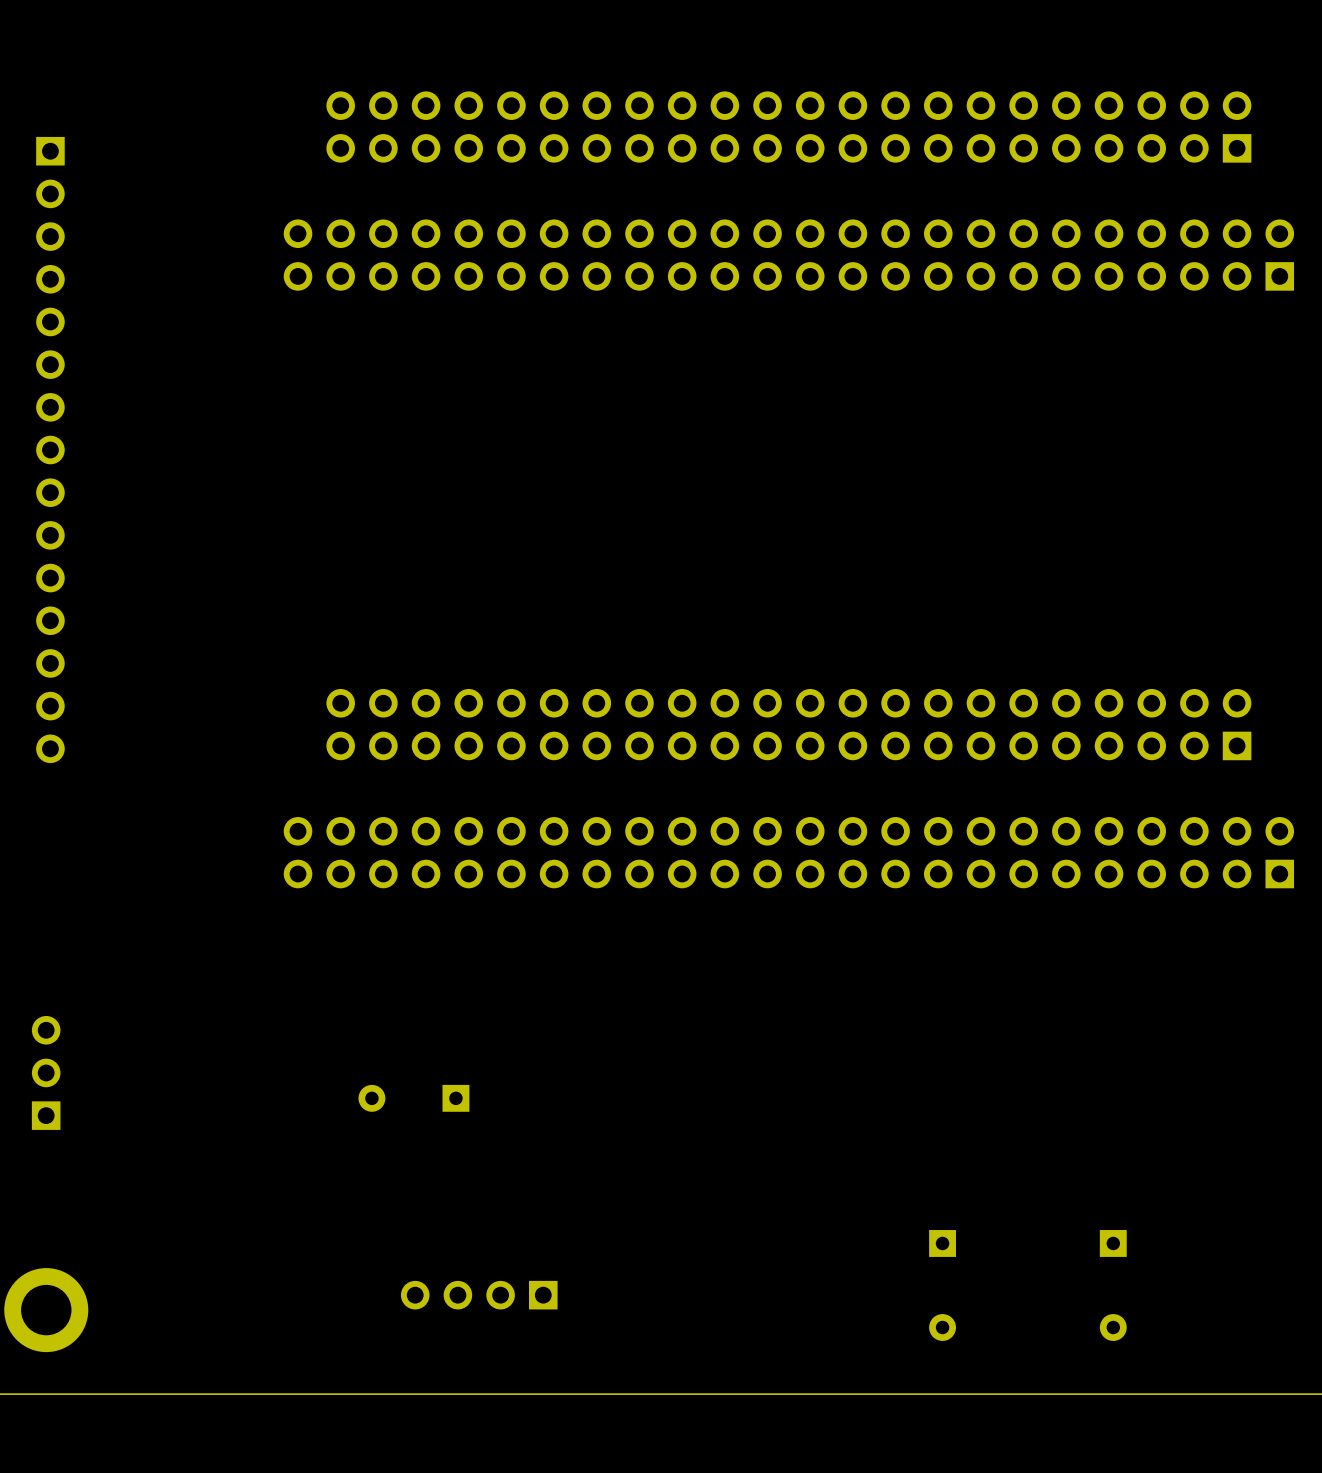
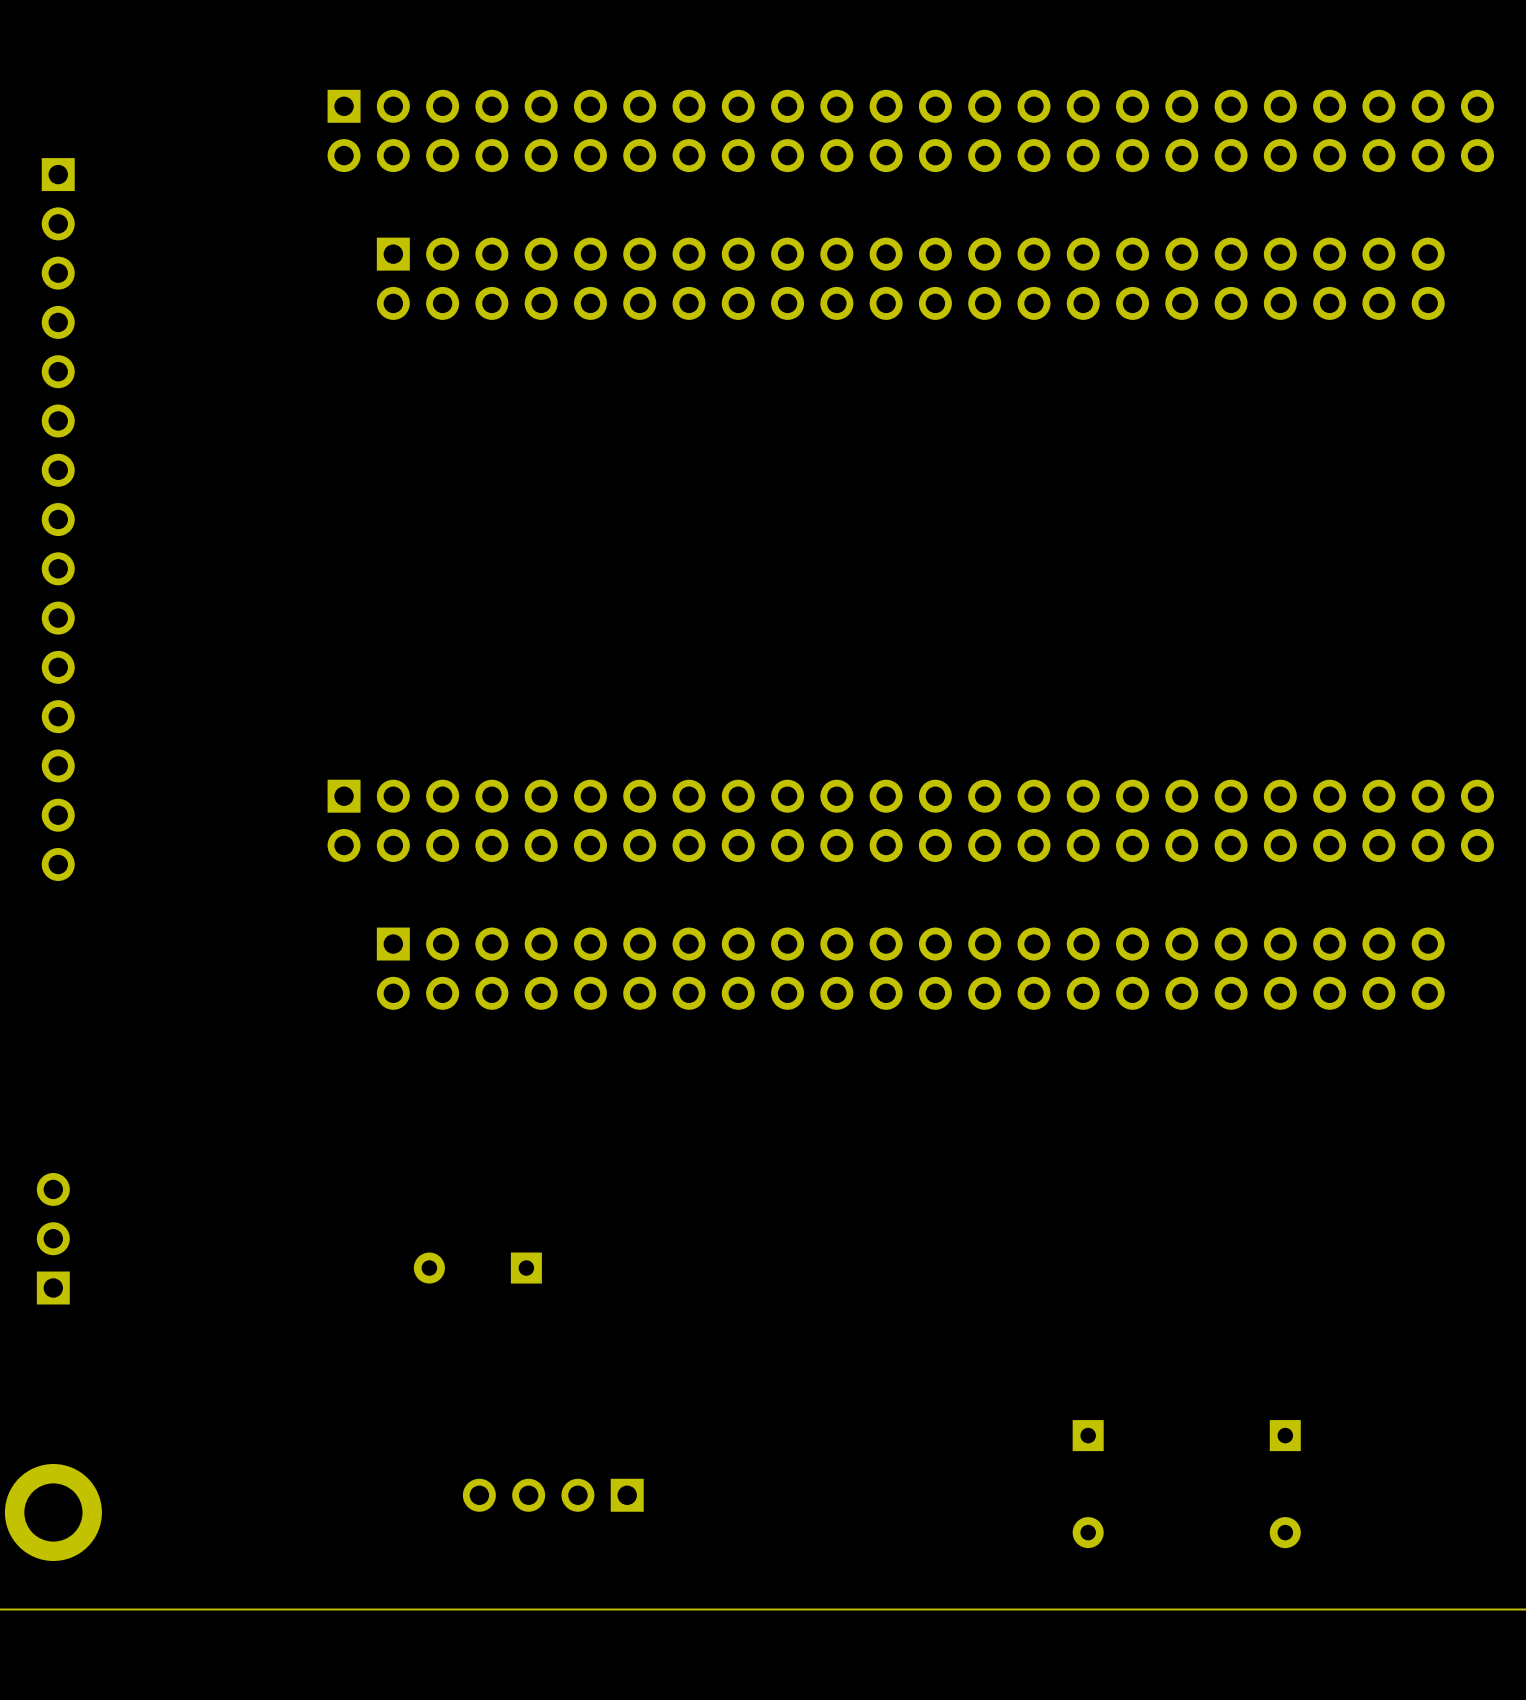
part footprint: [326, 91, 1252, 163] -> [327, 89, 1494, 173]
part footprint: [283, 219, 1295, 291] -> [376, 237, 1445, 320]
part footprint: [326, 688, 1252, 761] -> [327, 779, 1494, 862]
part footprint: [283, 817, 1295, 889] -> [376, 927, 1445, 1010]

